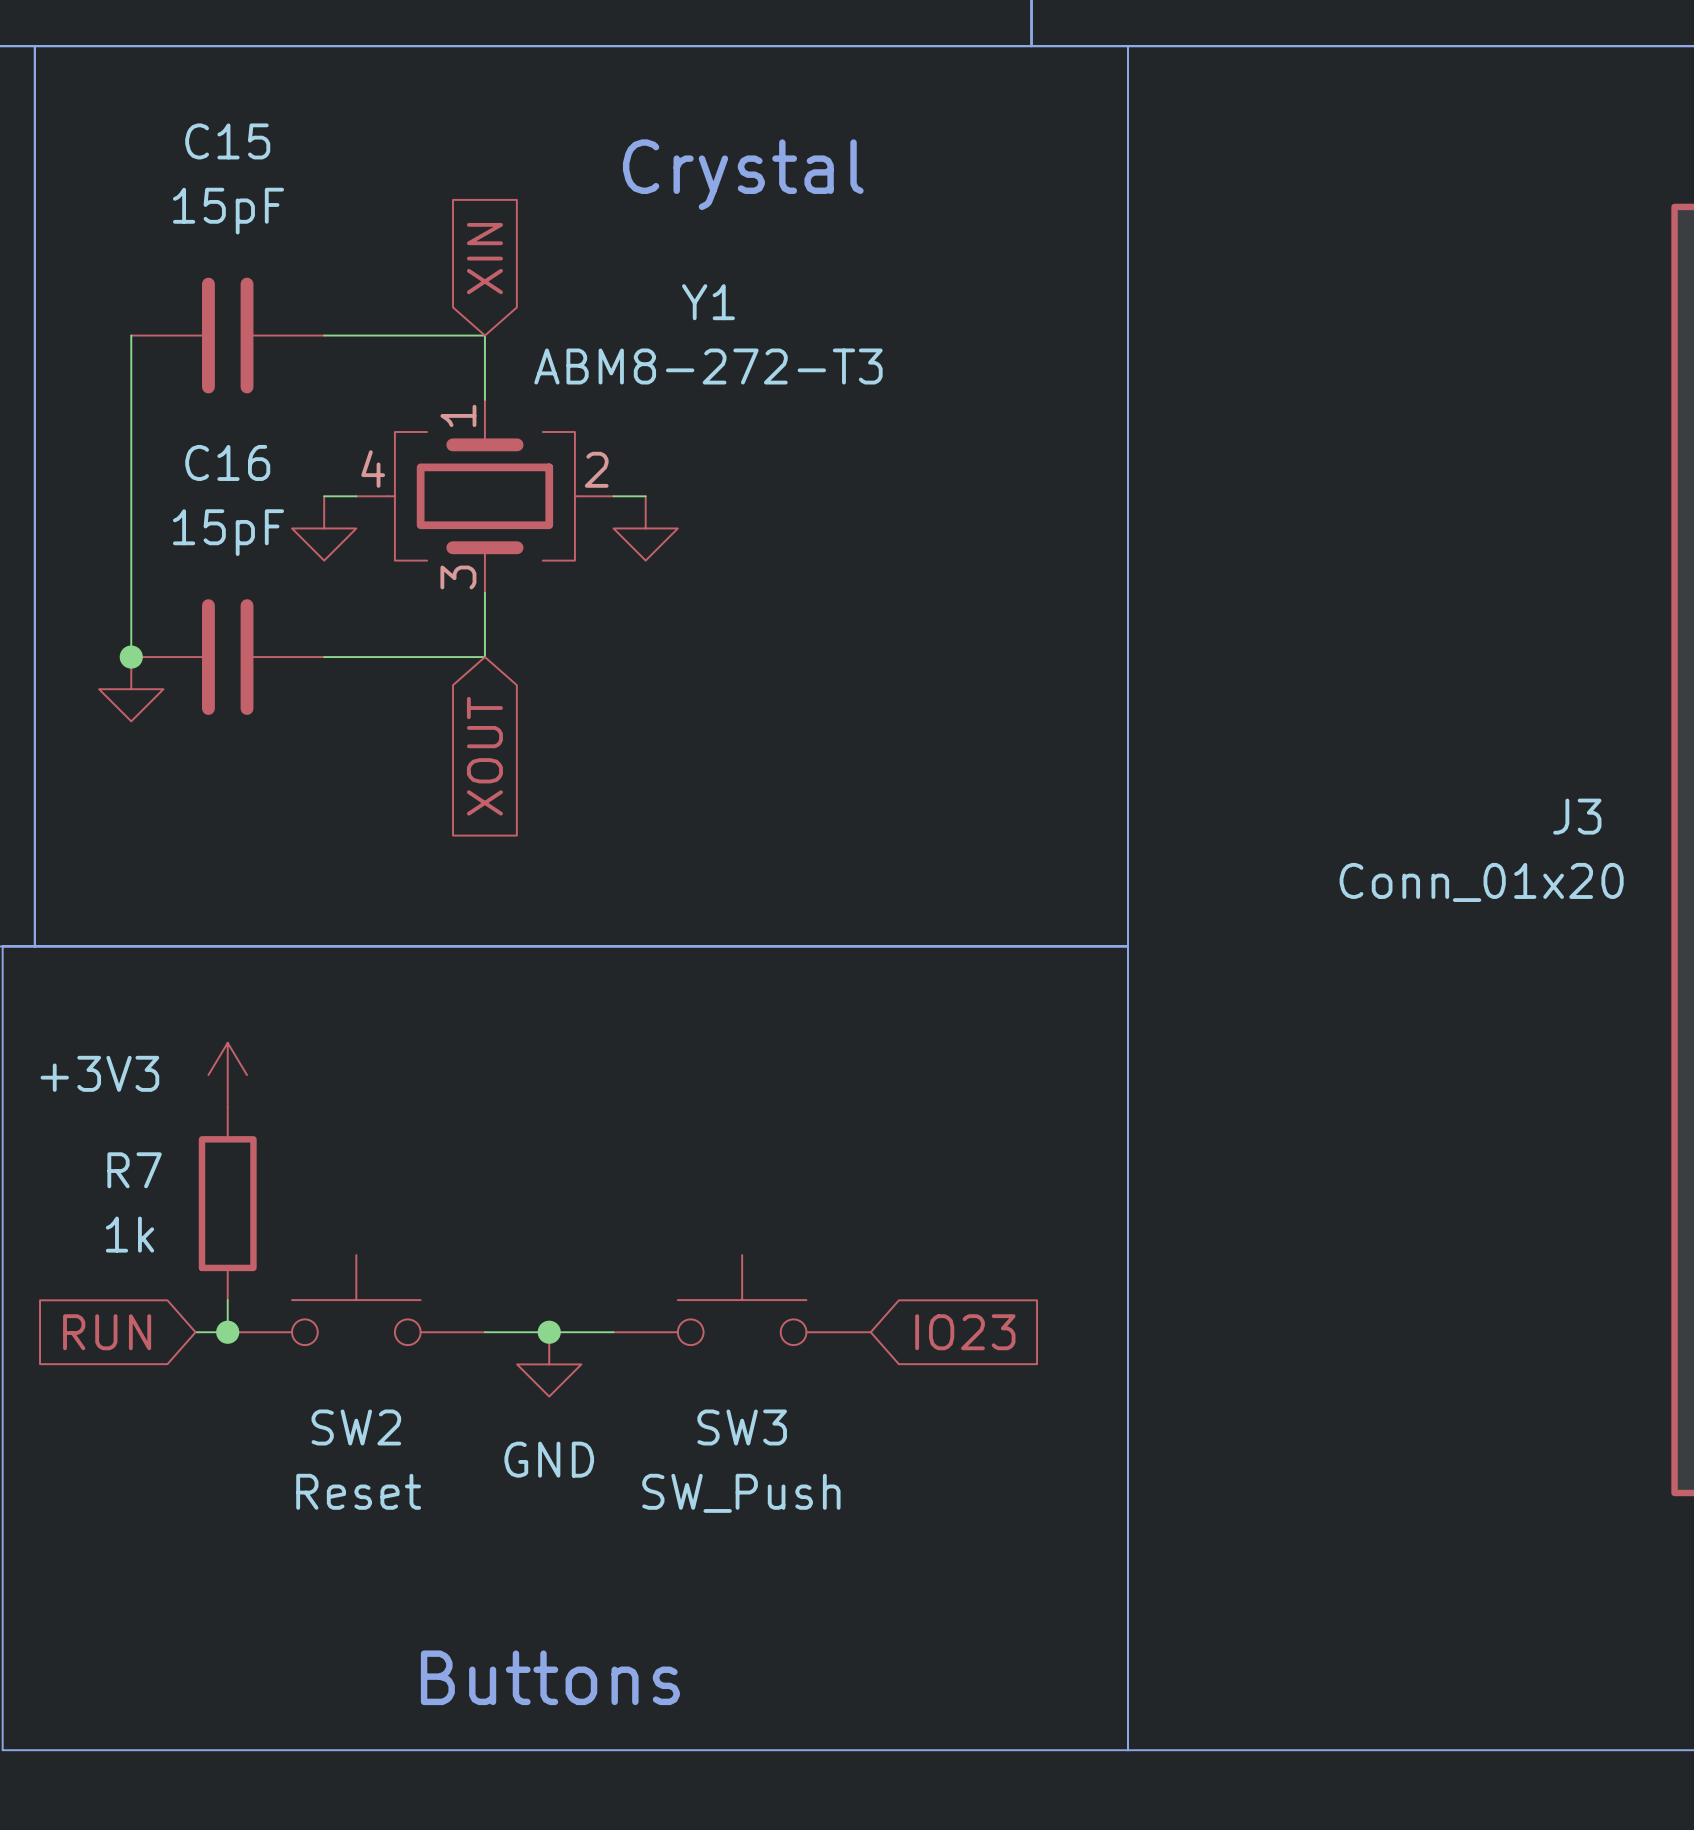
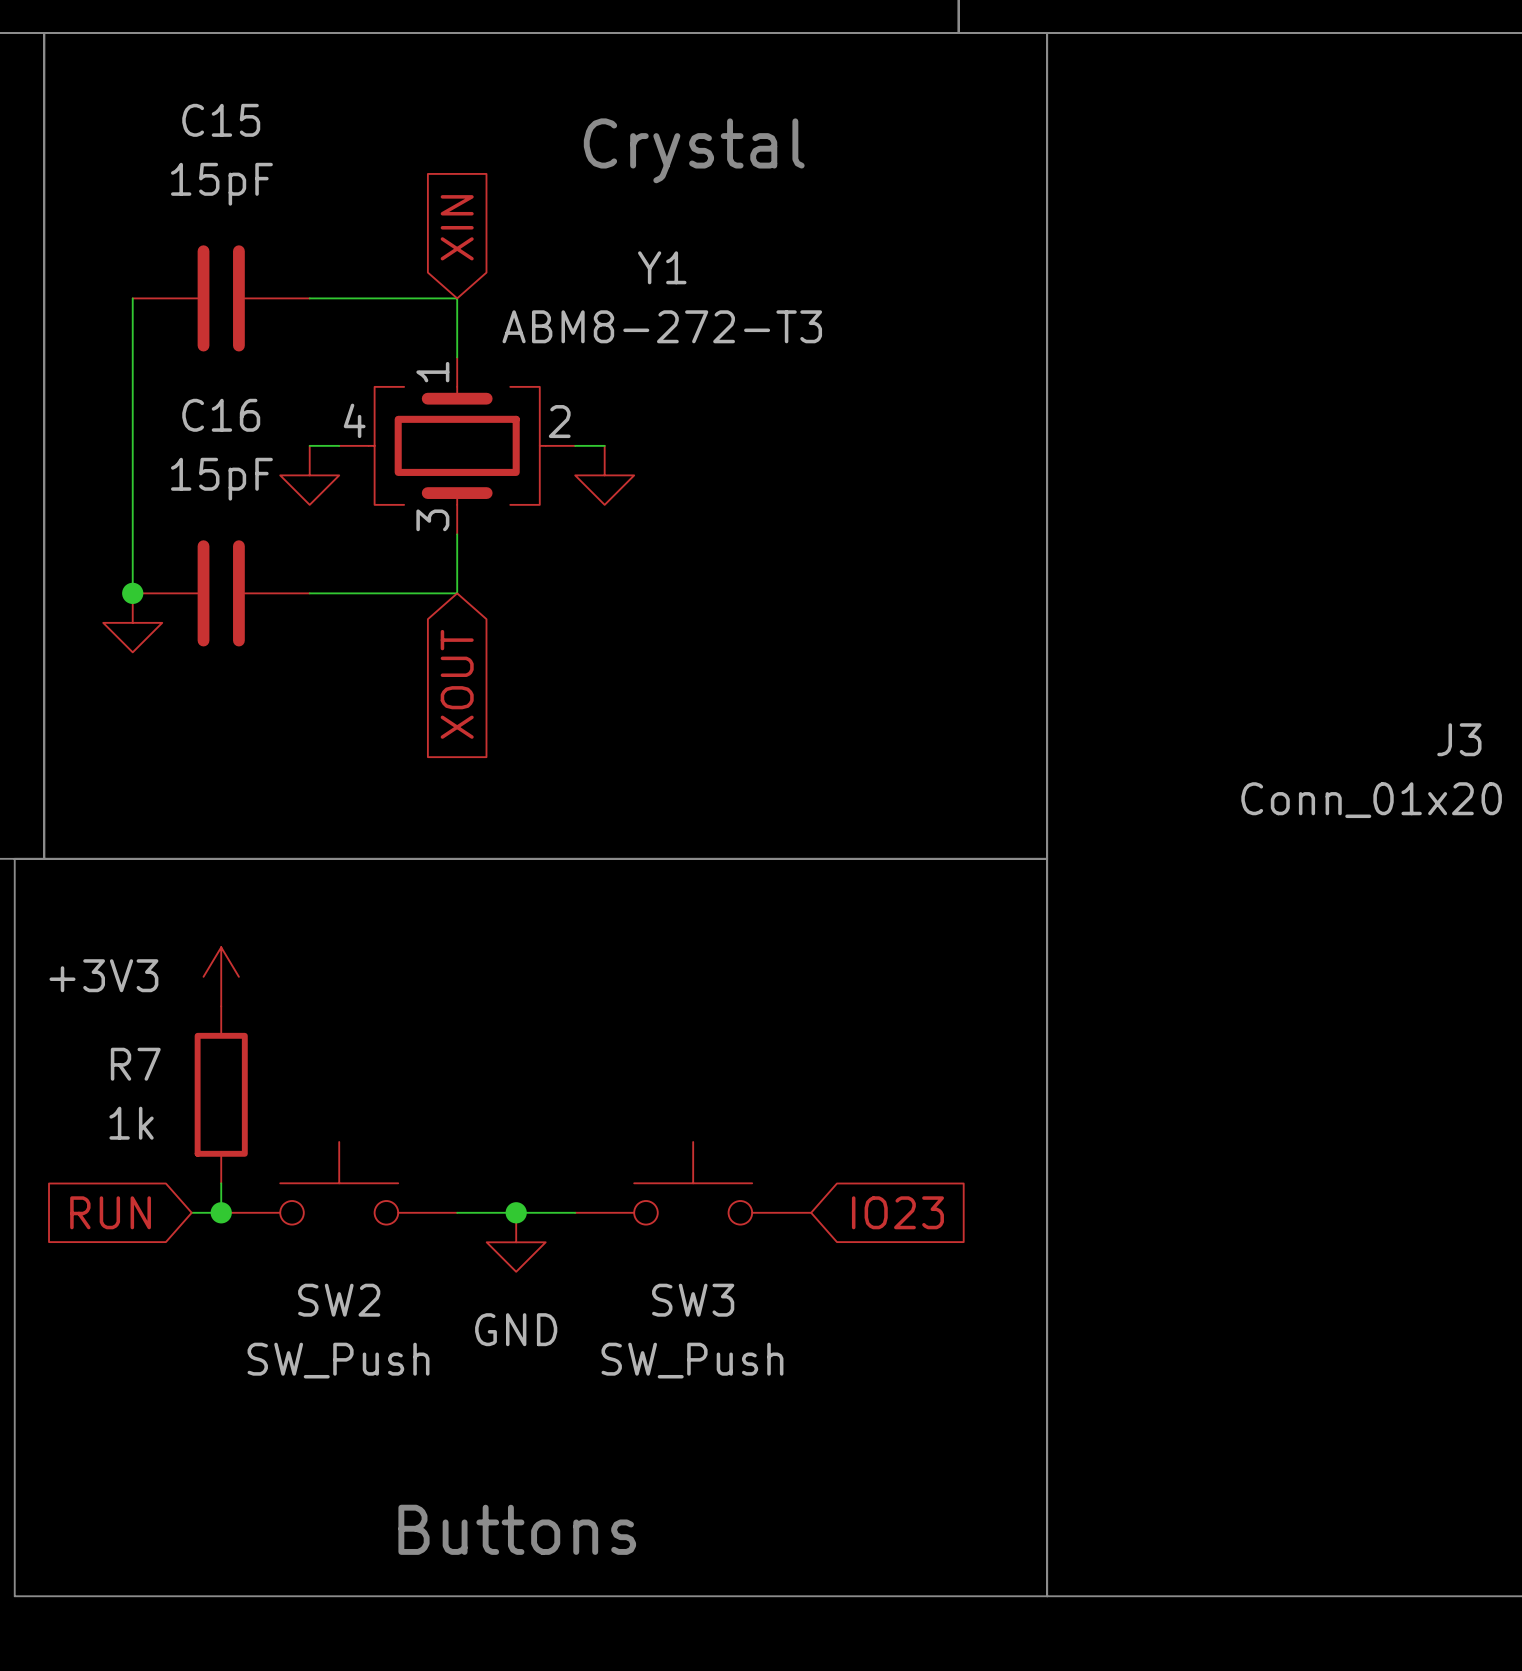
SW2 value: Reset (358, 1491) -> SW_Push (338, 1360)

